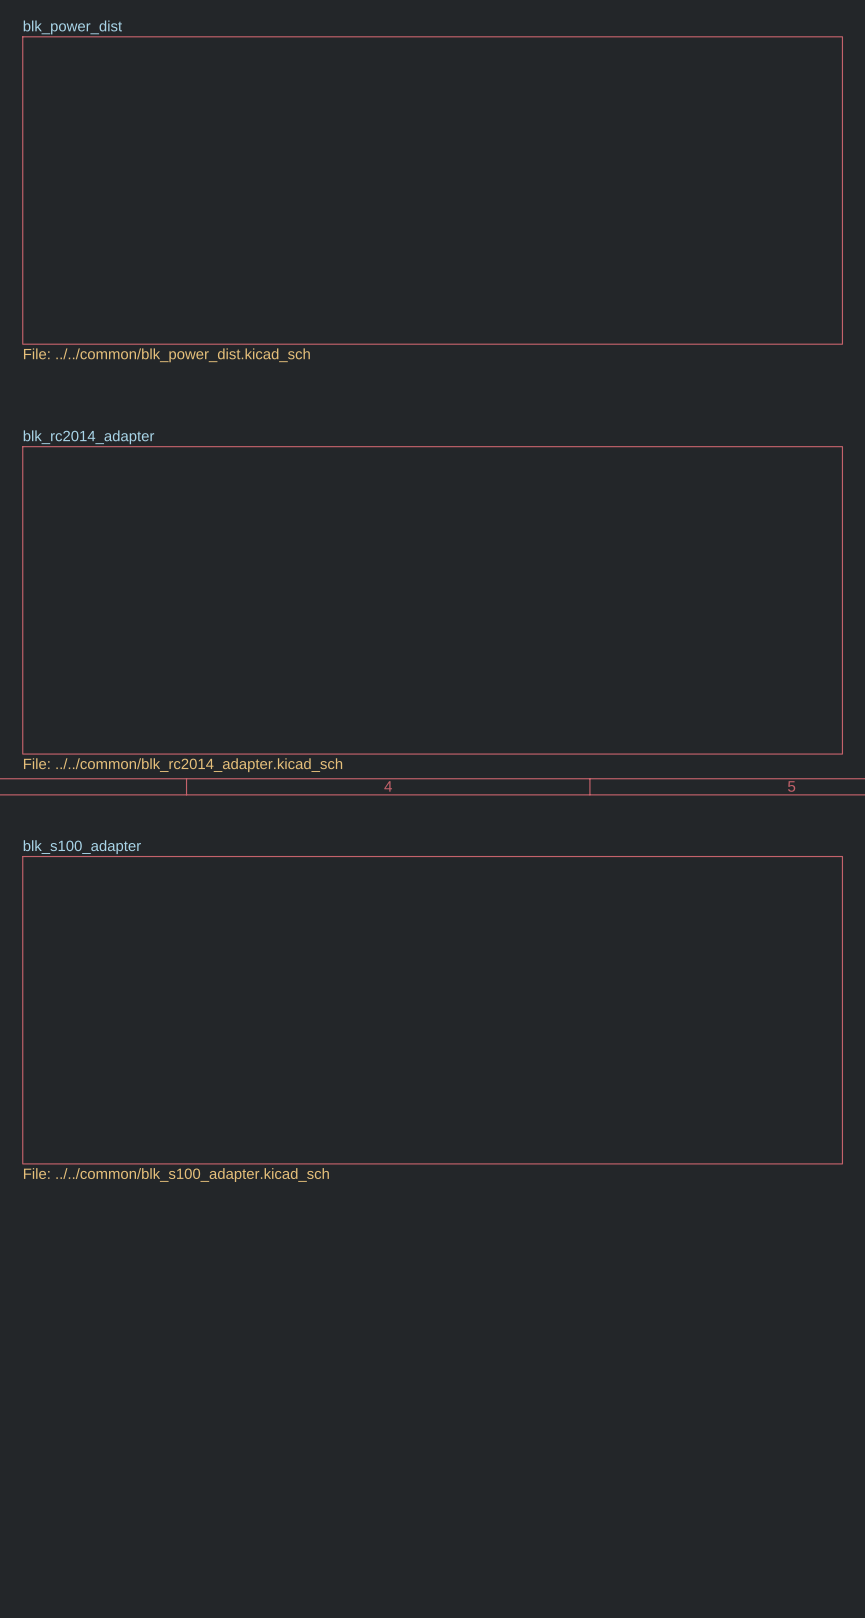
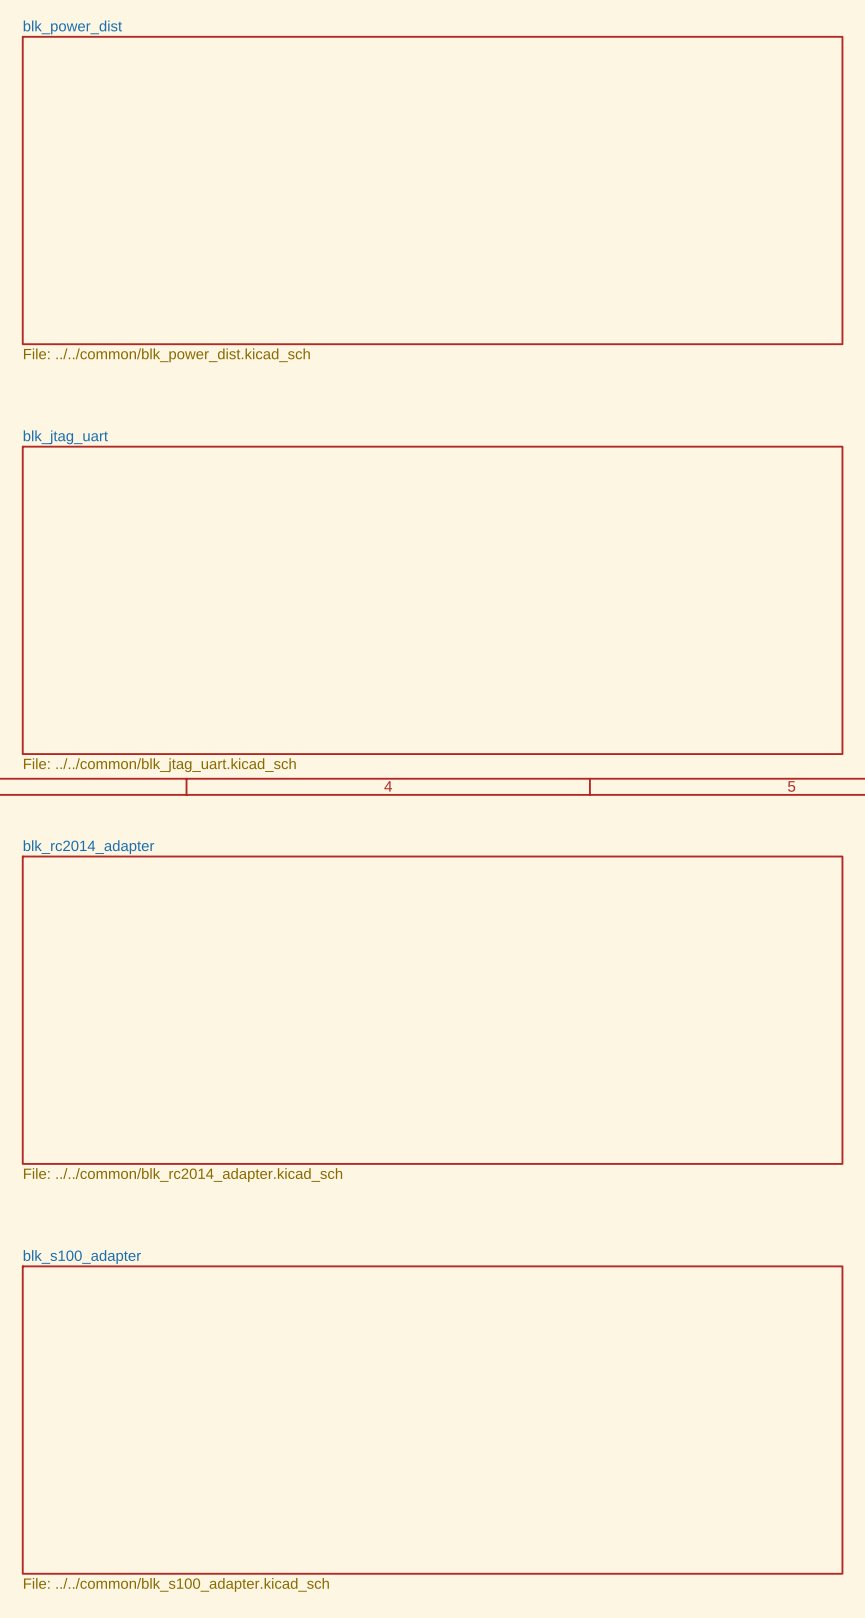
sheet blk_rc2014_adapter name: blk_rc2014_adapter (88, 437) -> blk_jtag_uart (65, 437)
sheet blk_rc2014_adapter value: File: ../../common/blk_rc2014_adapter.kicad_sch (183, 765) -> File: ../../common/blk_jtag_uart.kicad_sch (159, 765)
sheet blk_s100_adapter name: blk_s100_adapter (82, 847) -> blk_rc2014_adapter (88, 847)
sheet blk_s100_adapter value: File: ../../common/blk_s100_adapter.kicad_sch (176, 1175) -> File: ../../common/blk_rc2014_adapter.kicad_sch (183, 1175)
sheet blk_s100_adapter: none -> File: ../../common/blk_s100_adapter.kicad_sch (432, 1420)

